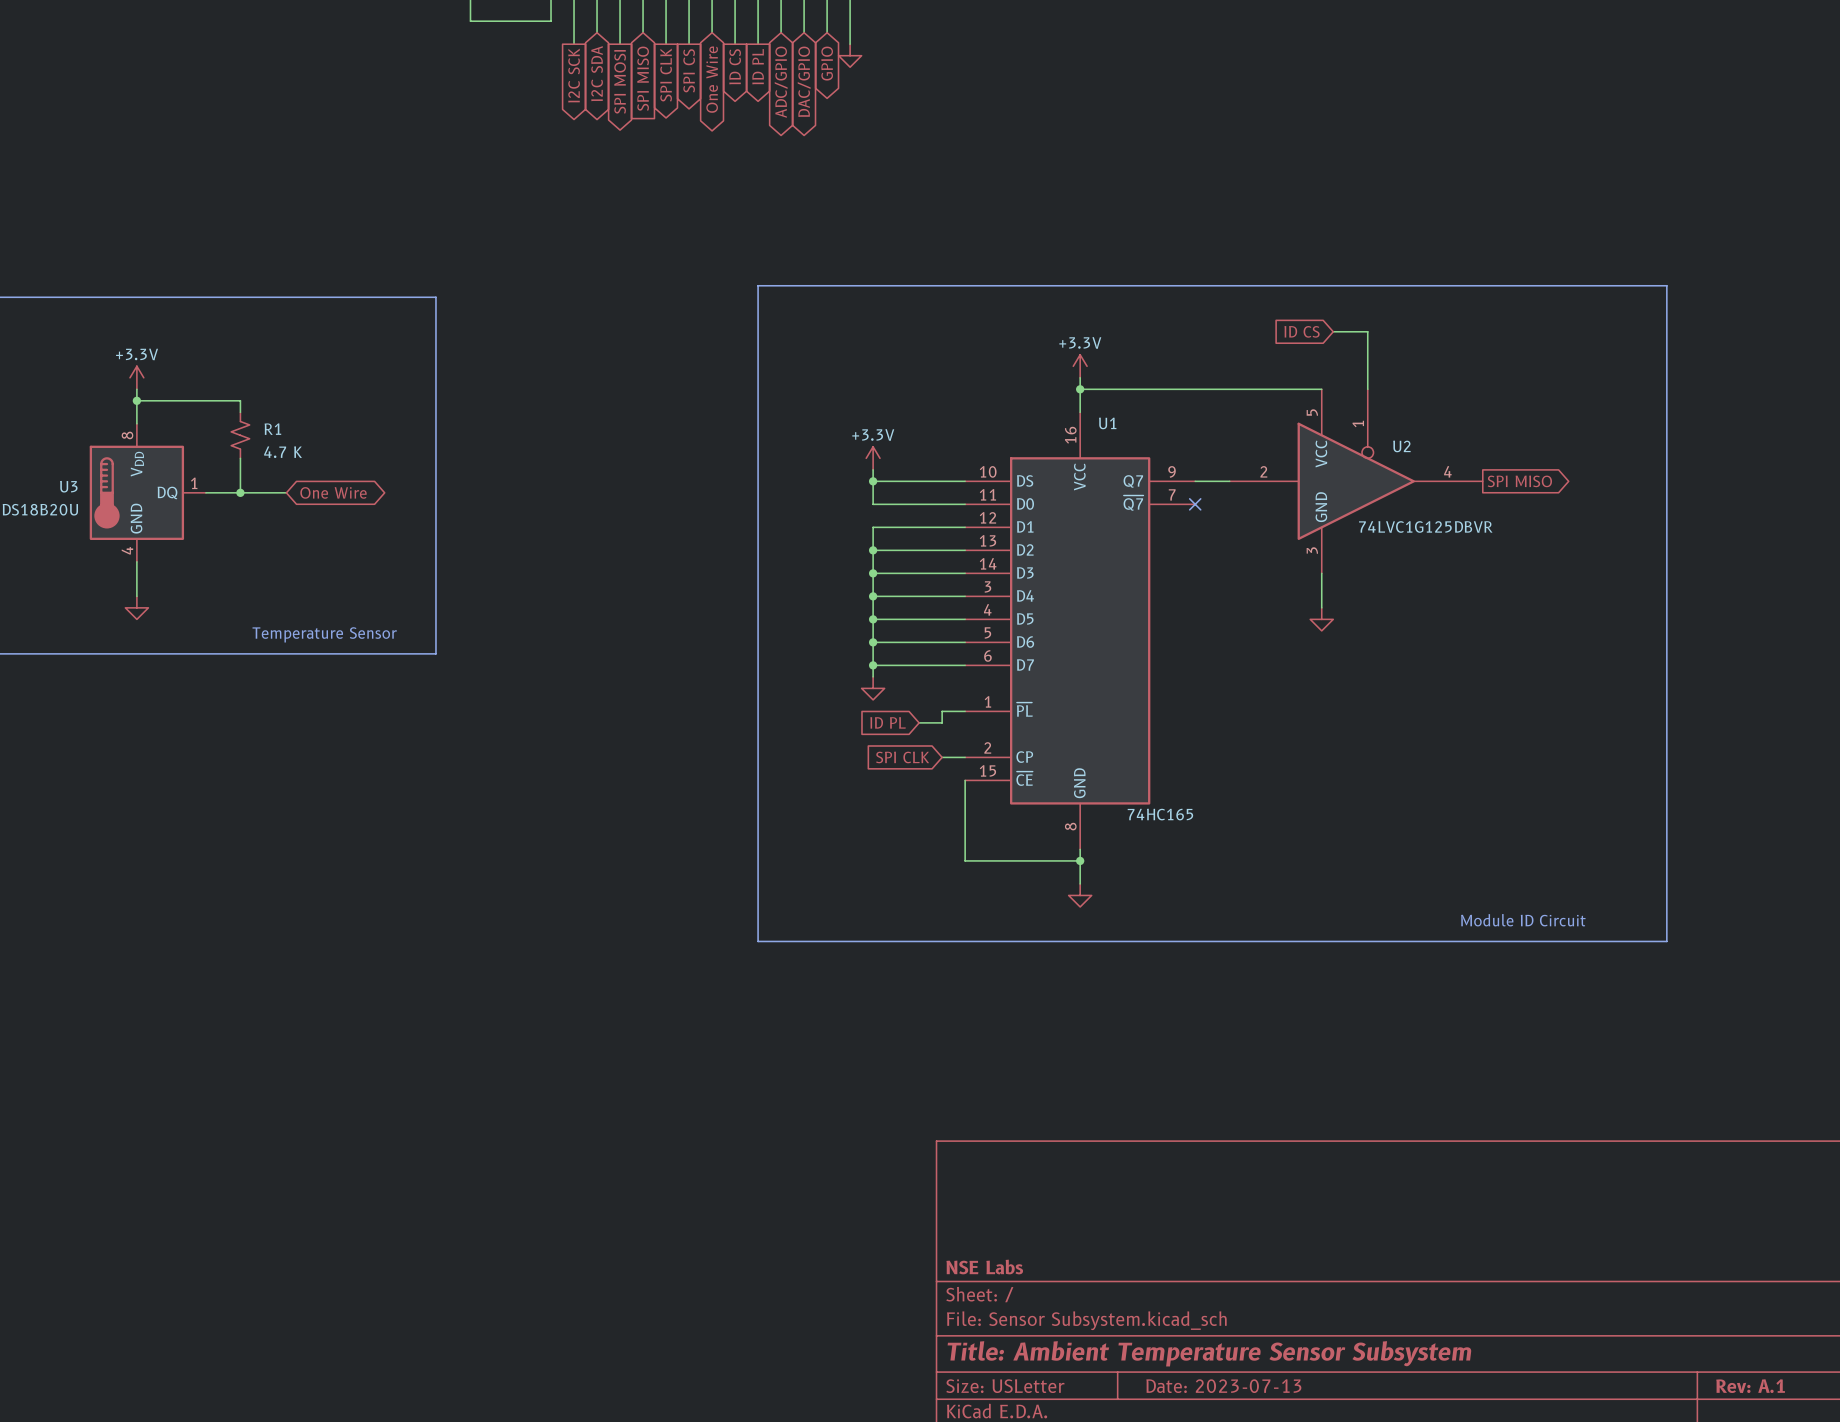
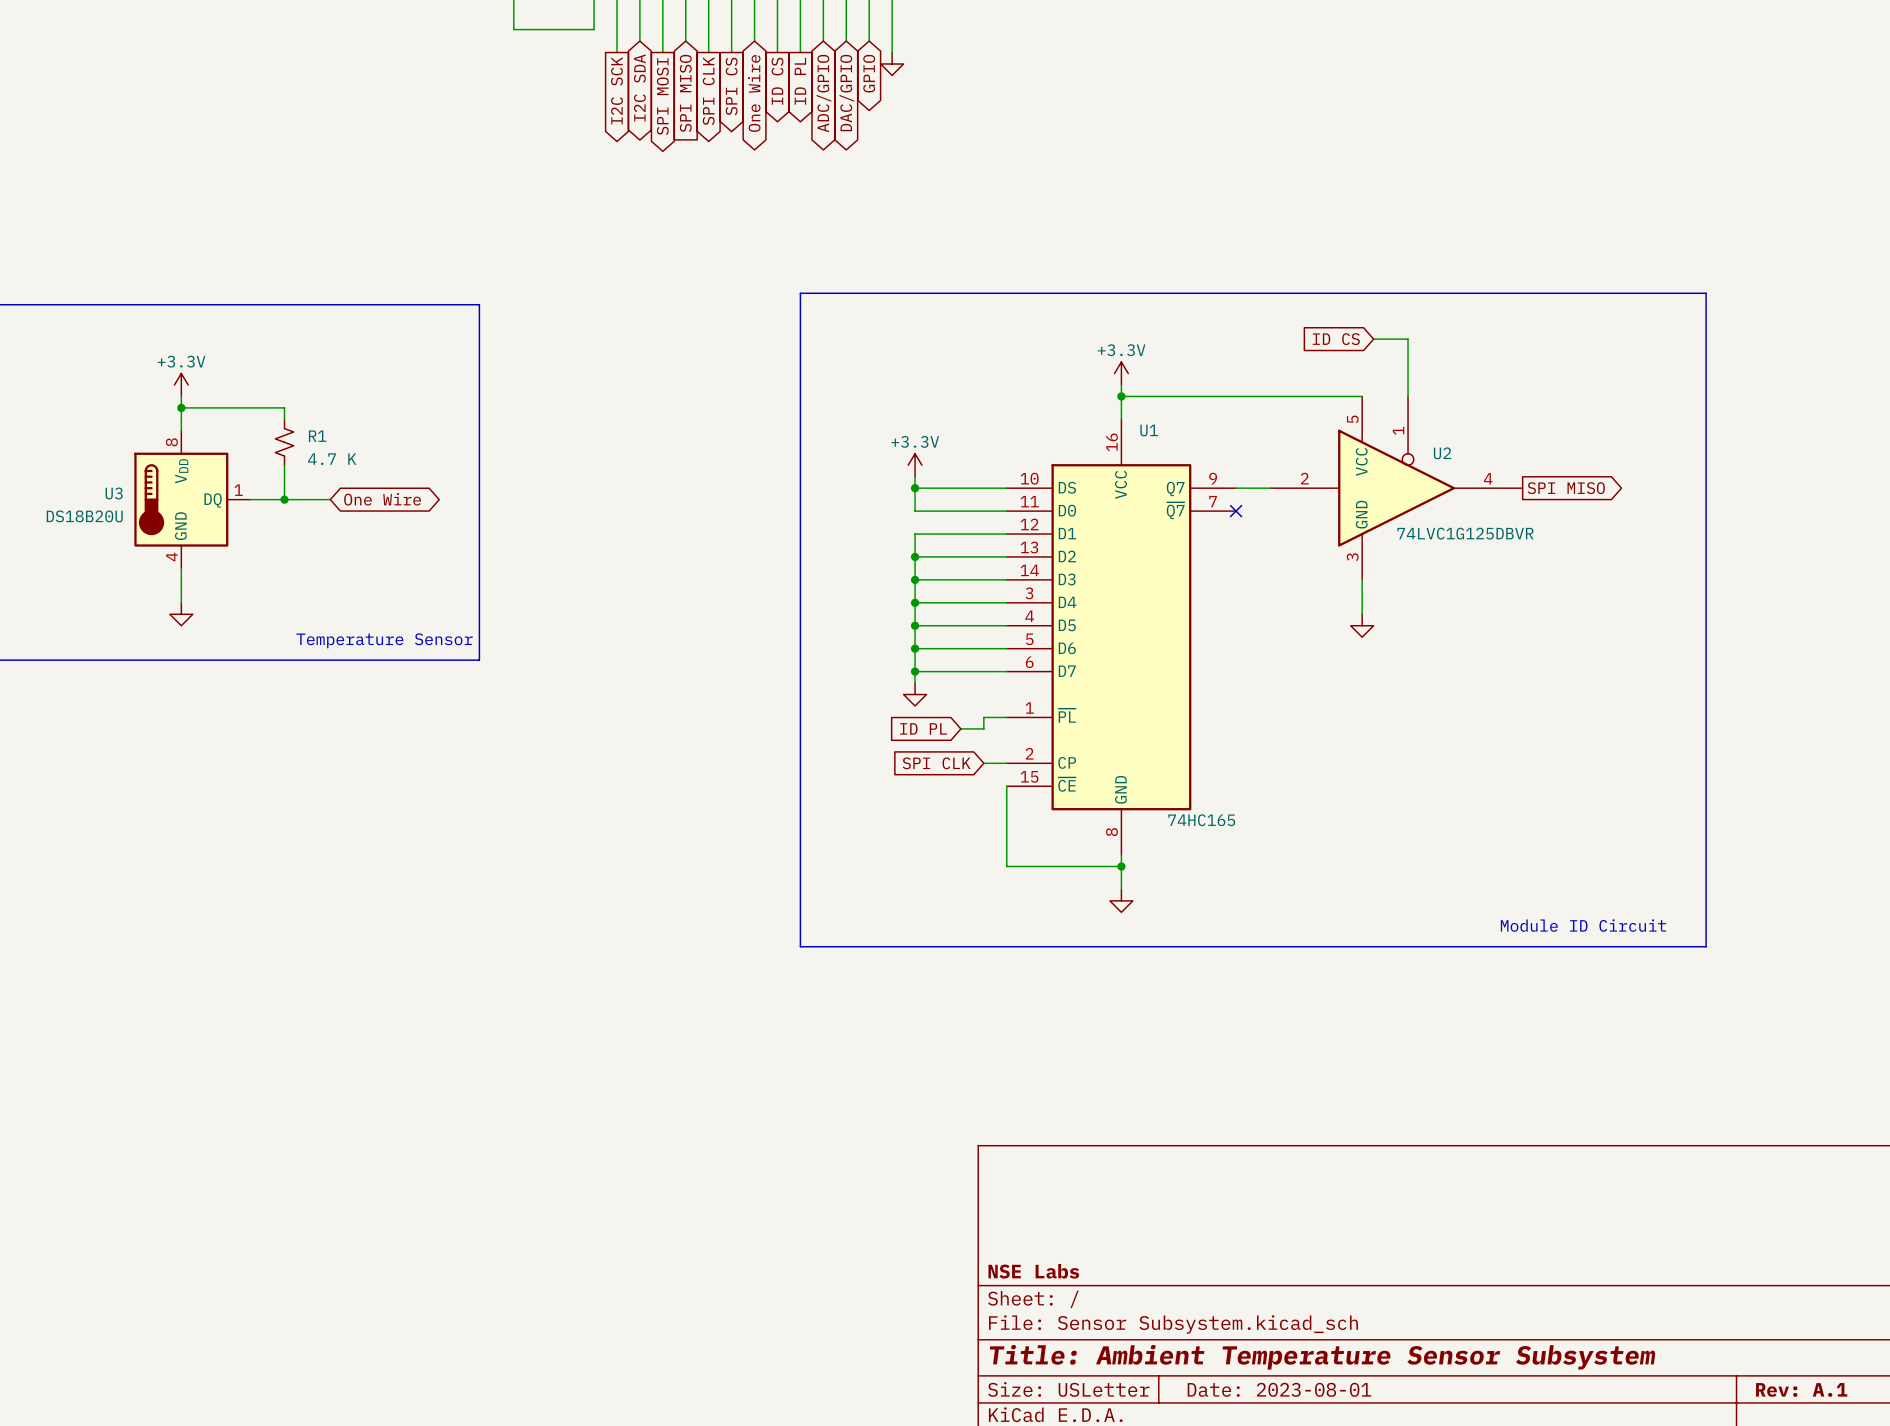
title block: Date: 2023-07-13 (1223, 1386) -> Date: 2023-08-01 (1279, 1389)

